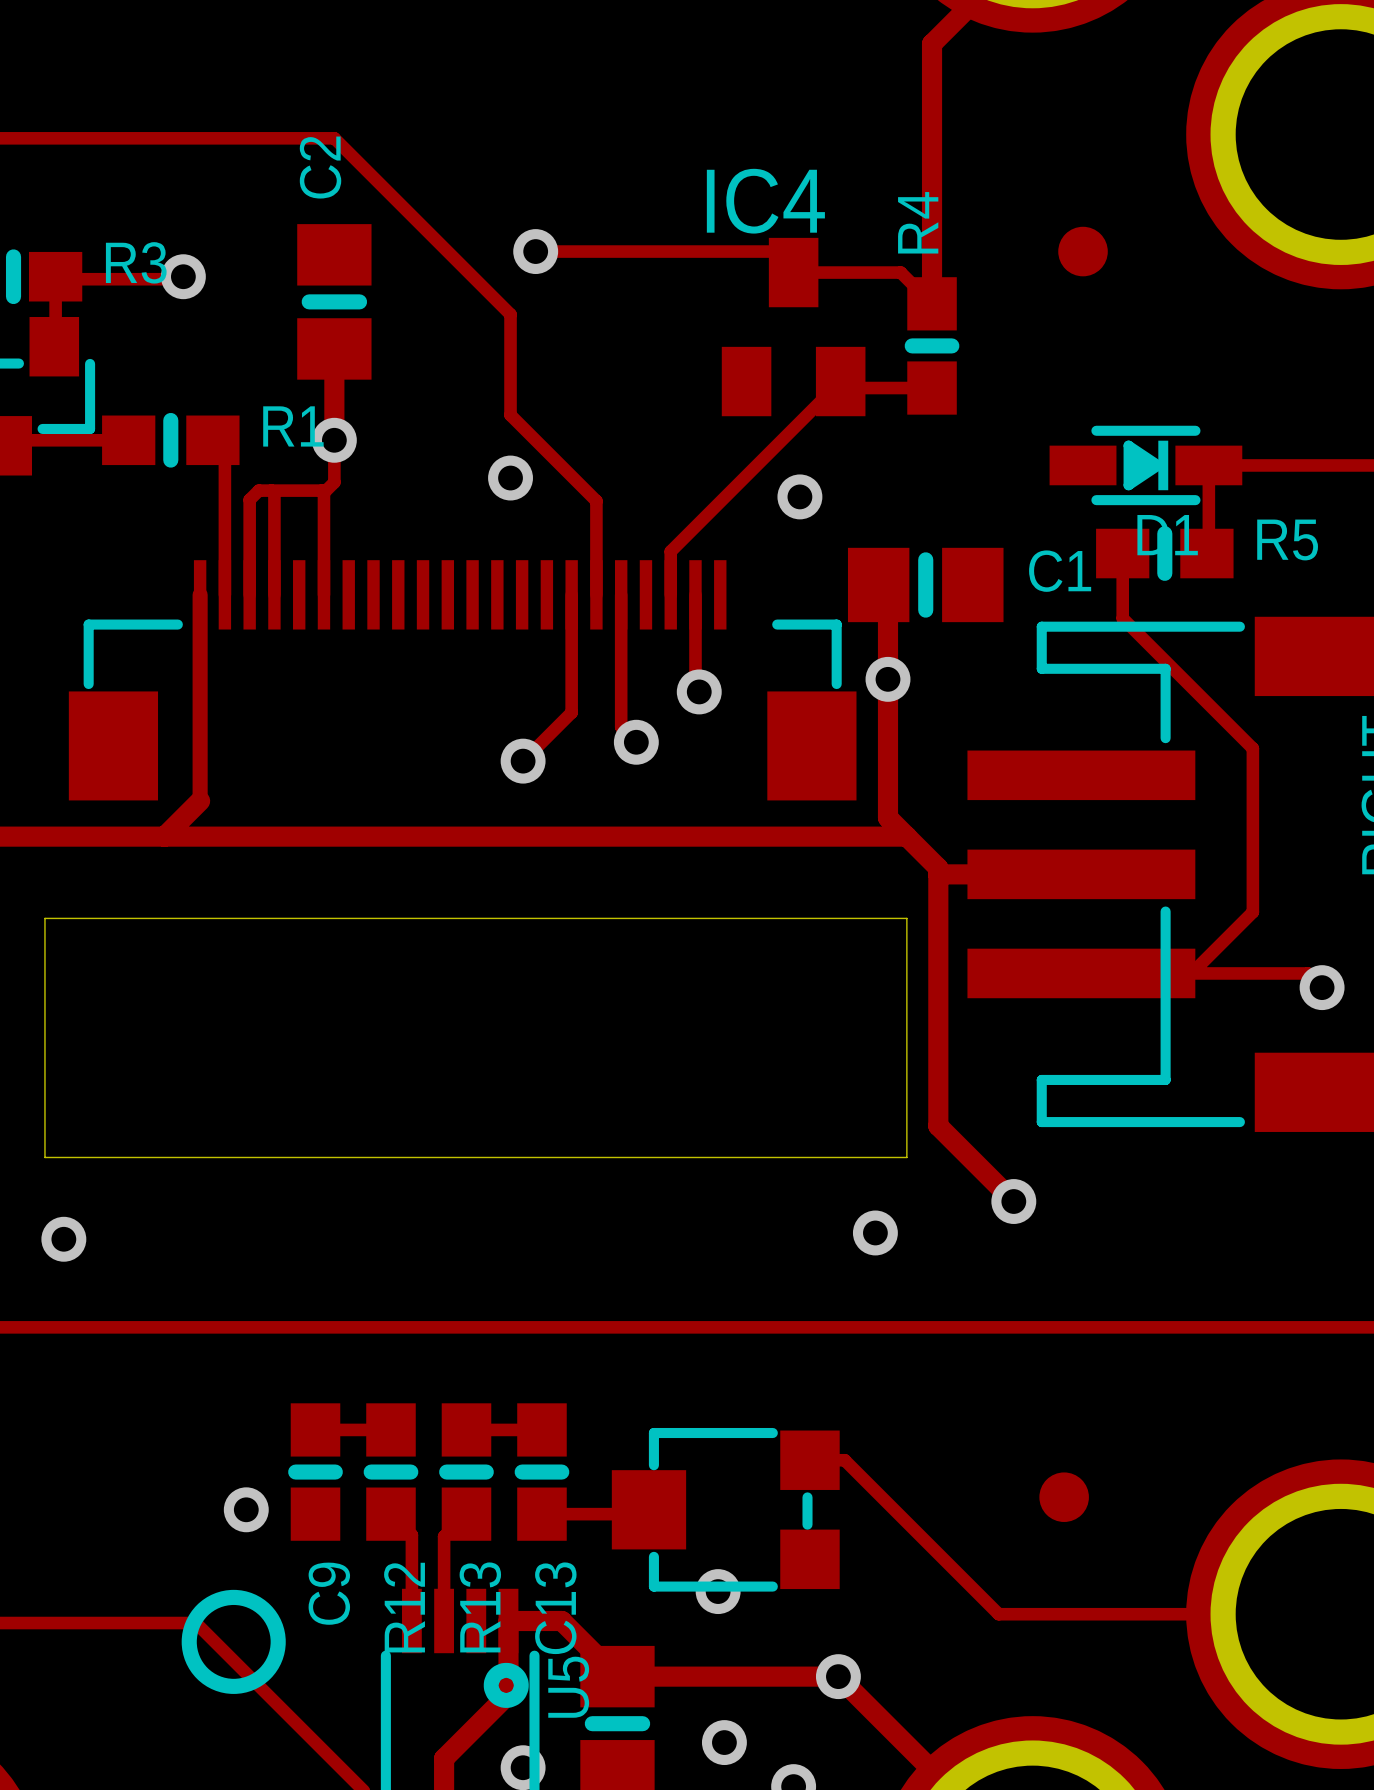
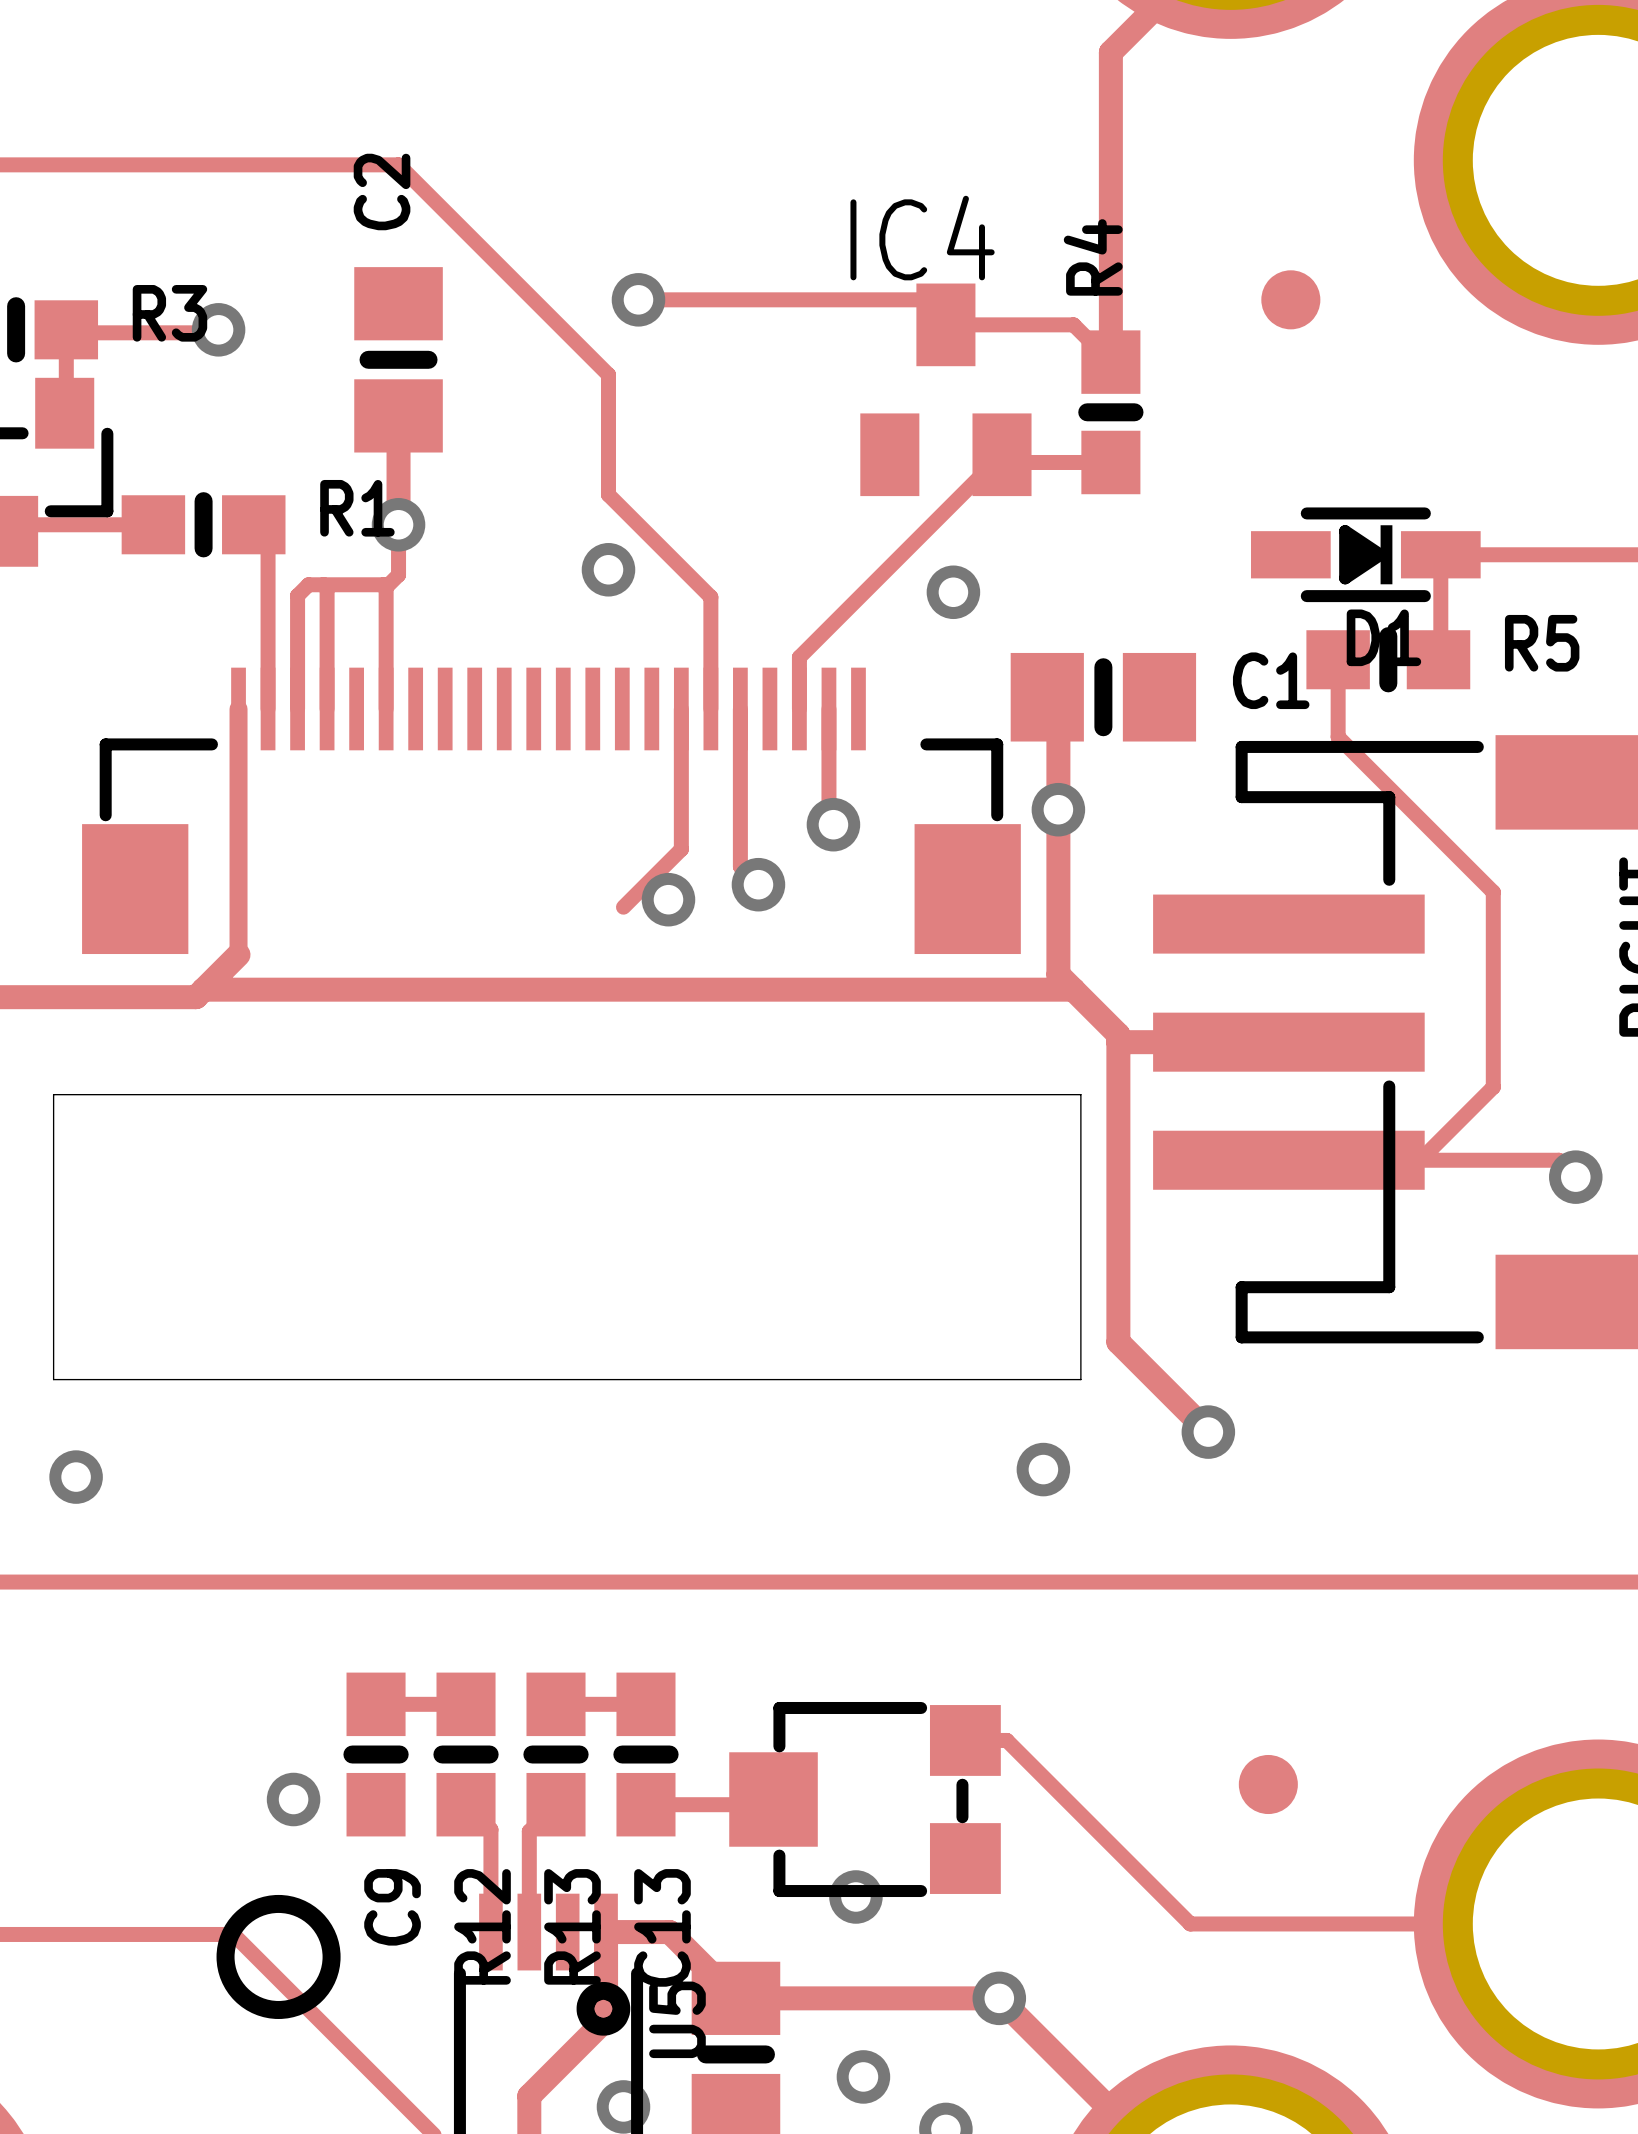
via position: (523, 761) -> (668, 899)
track: none -> (203, 989) (1073, 989)
track: (164, 836) (906, 836) -> none

